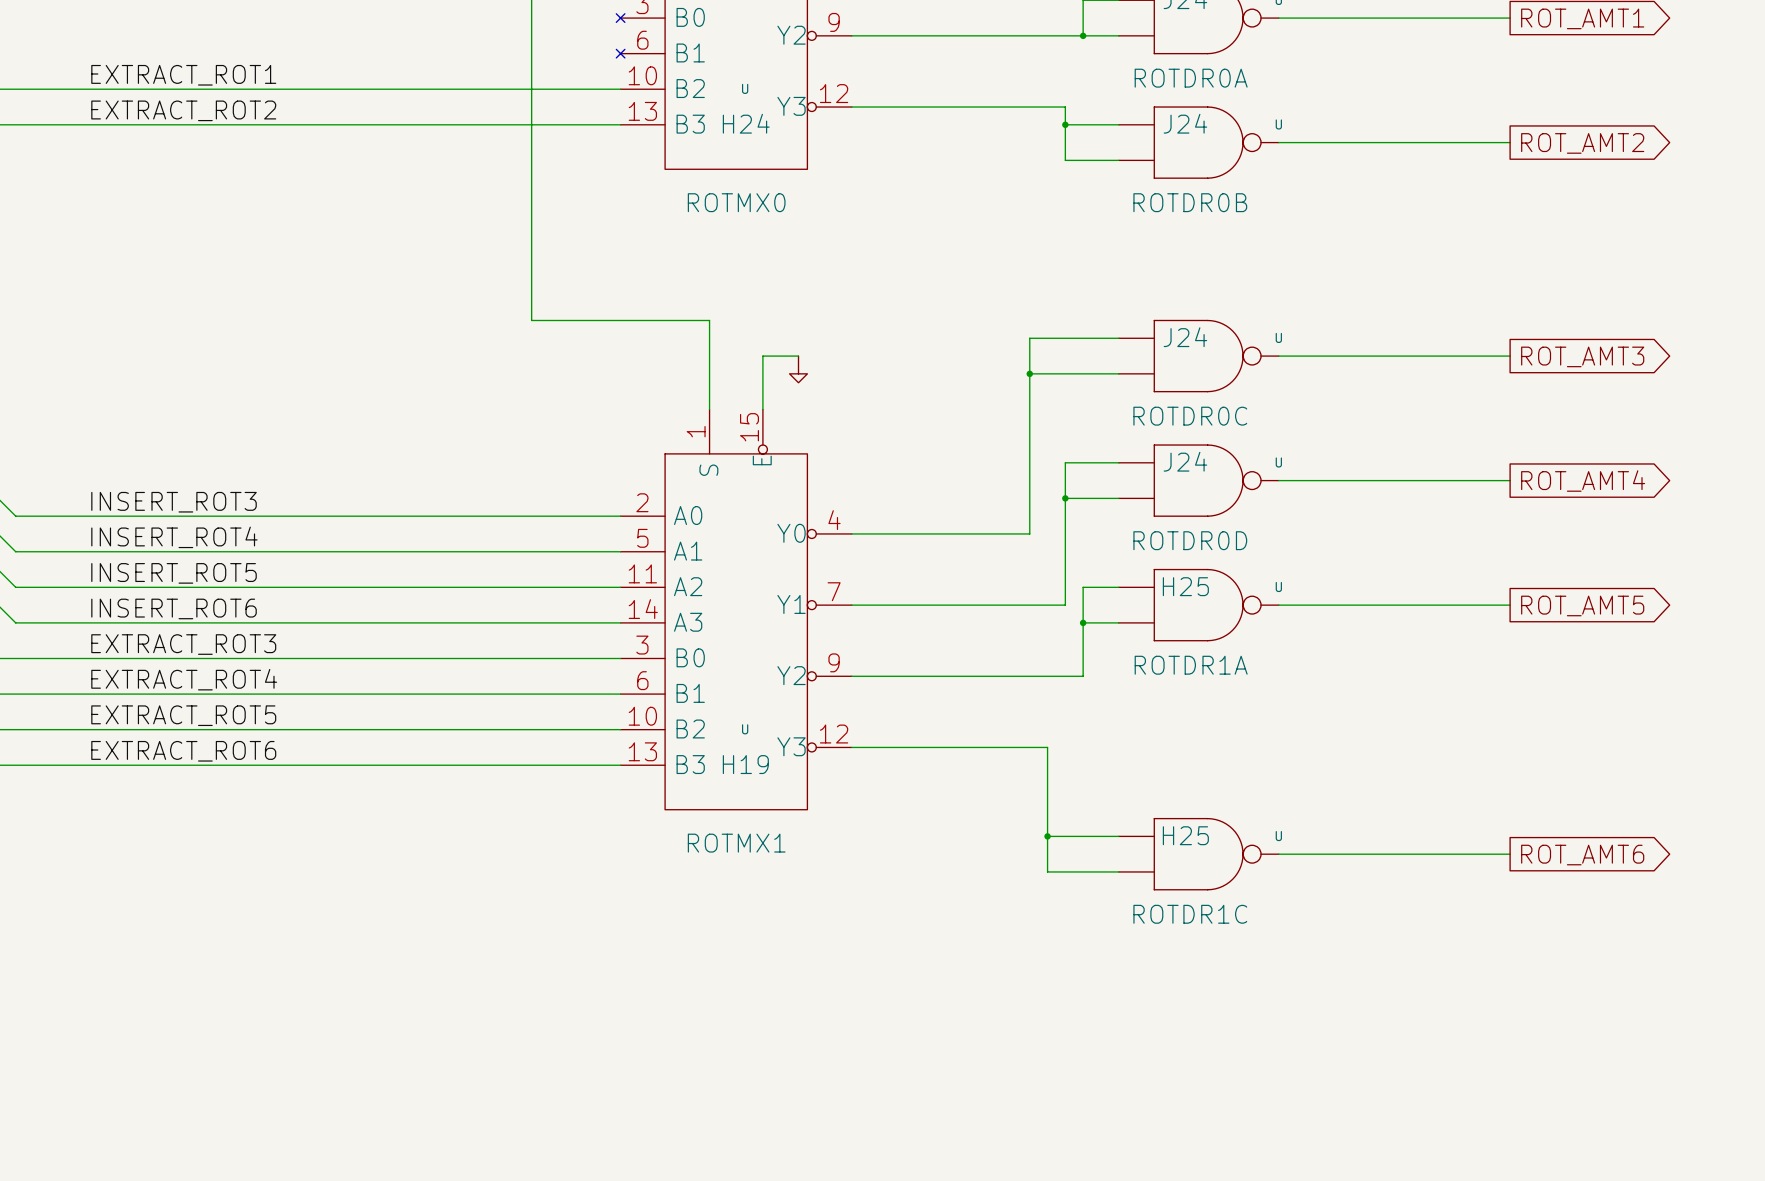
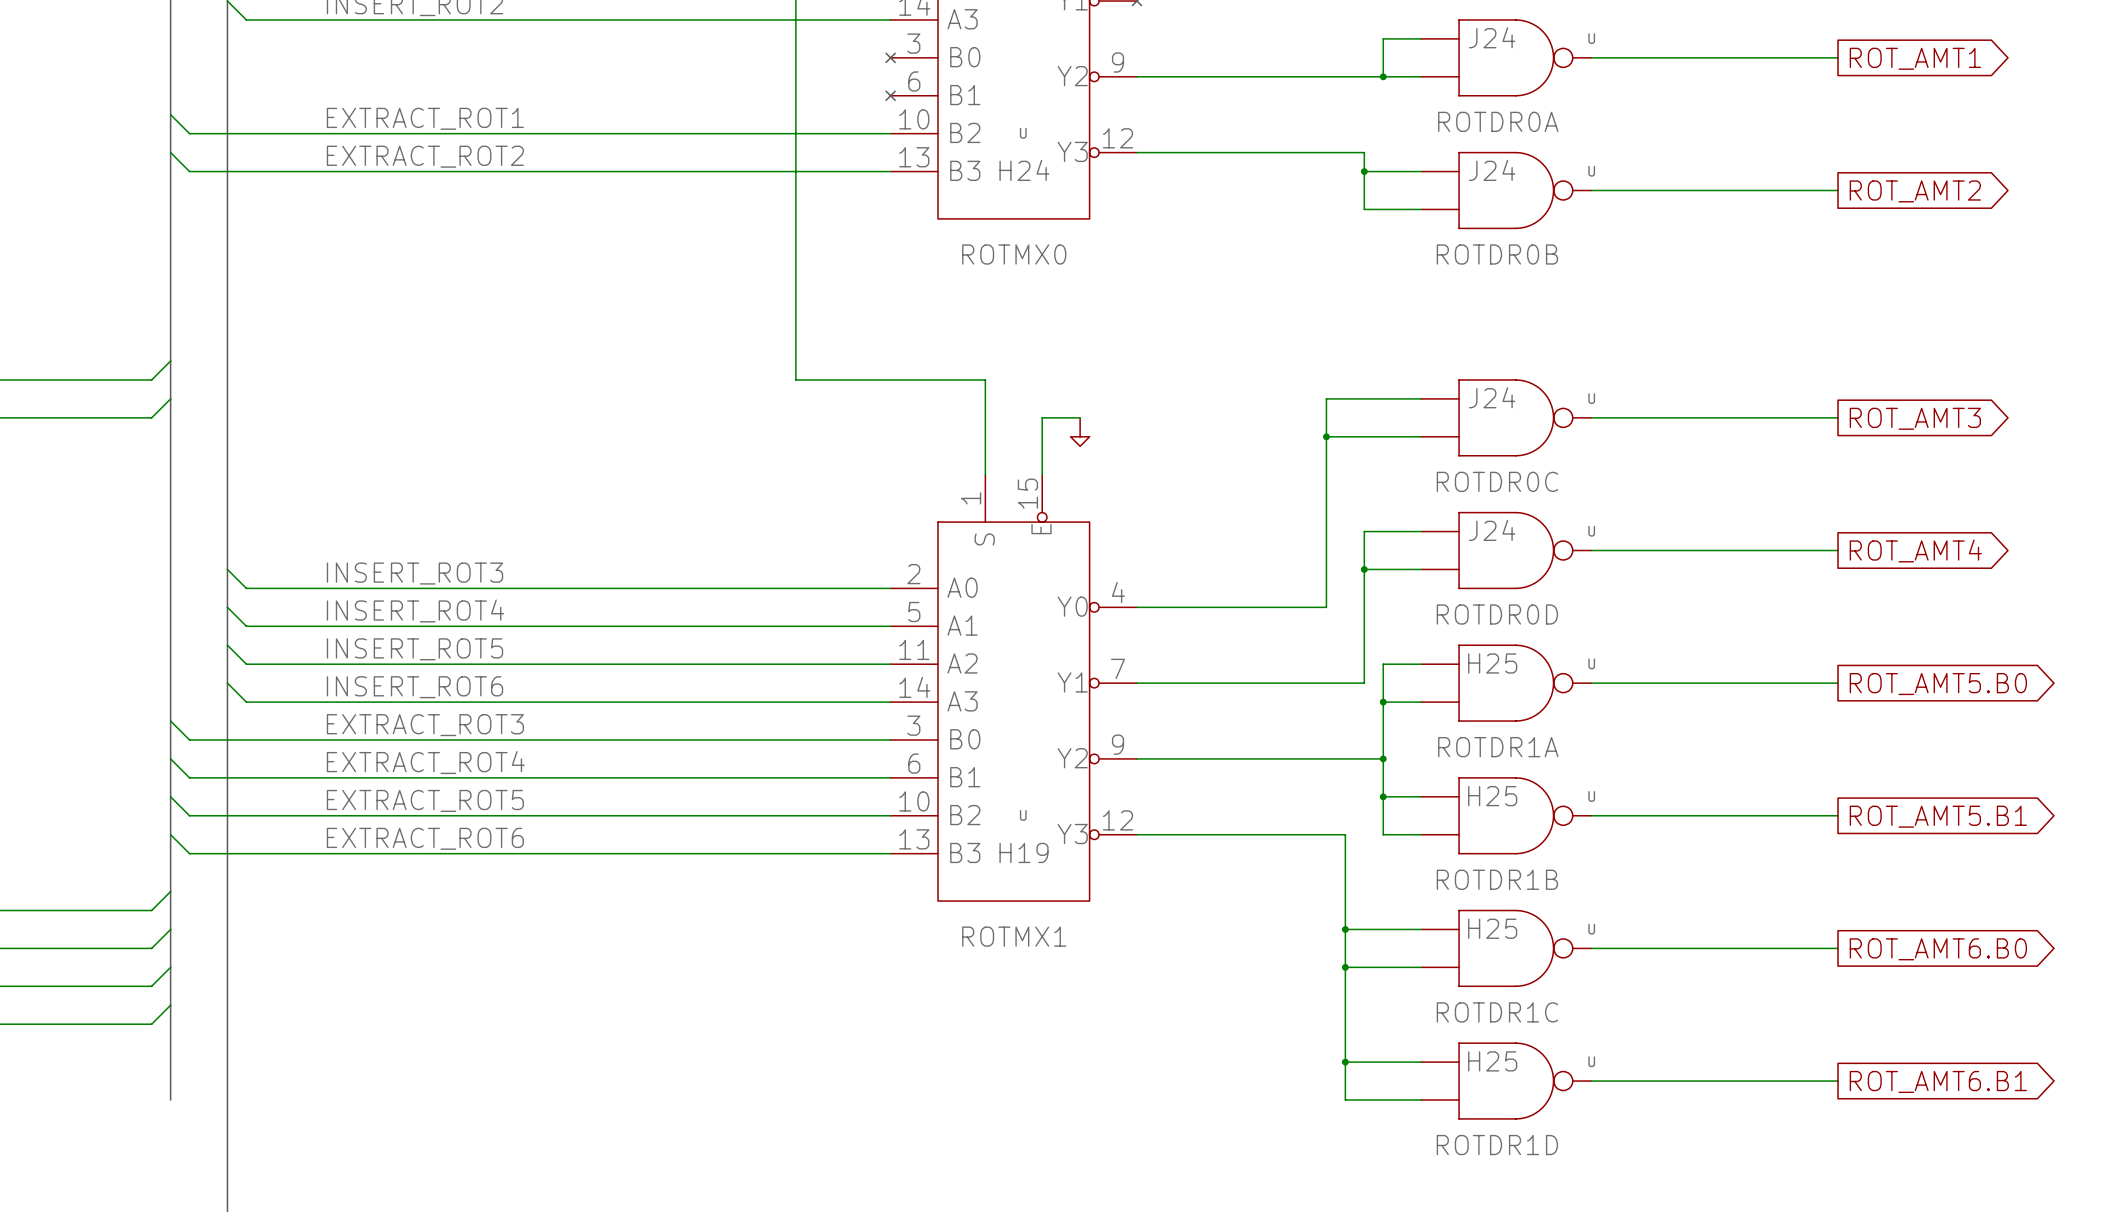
global label: ROT_AMT5 (1582, 605) -> ROT_AMT5.B0 (1938, 684)
wire: none -> (1383, 758) (1383, 834) (1421, 834)
junction: none -> (1383, 758)
wire: none -> (1383, 796) (1421, 796)
junction: none -> (1383, 796)
U: none -> (1506, 815)
wire: none -> (1591, 815) (1838, 815)
global label: none -> ROT_AMT5.B1 (1938, 816)
global label: ROT_AMT6 (1582, 855) -> ROT_AMT6.B0 (1938, 949)
wire: none -> (1345, 967) (1345, 1099) (1421, 1099)
junction: none -> (1345, 967)
wire: none -> (1345, 1062) (1421, 1062)
junction: none -> (1345, 1062)
U: none -> (1506, 1081)
wire: none -> (1591, 1081) (1838, 1081)
global label: none -> ROT_AMT6.B1 (1938, 1081)

